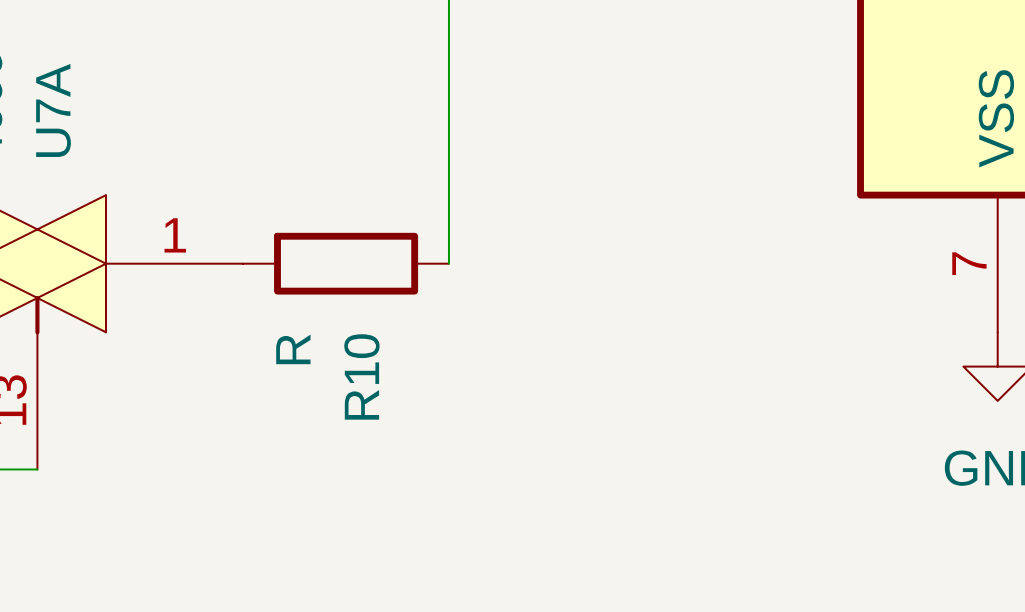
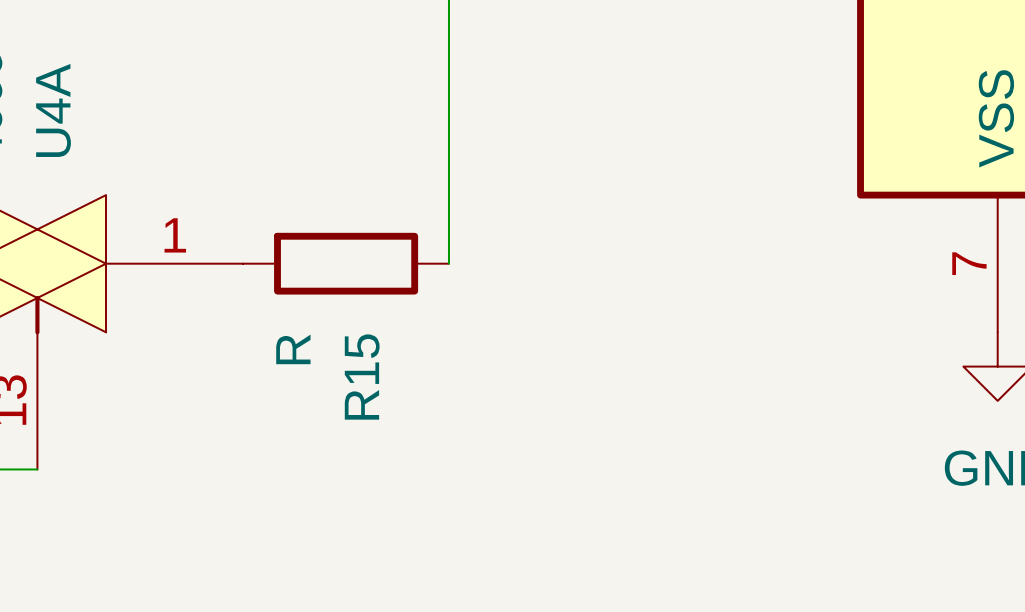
U7A name: U7A (53, 110) -> U4A (53, 110)
R10 name: R10 (361, 376) -> R15 (362, 377)

